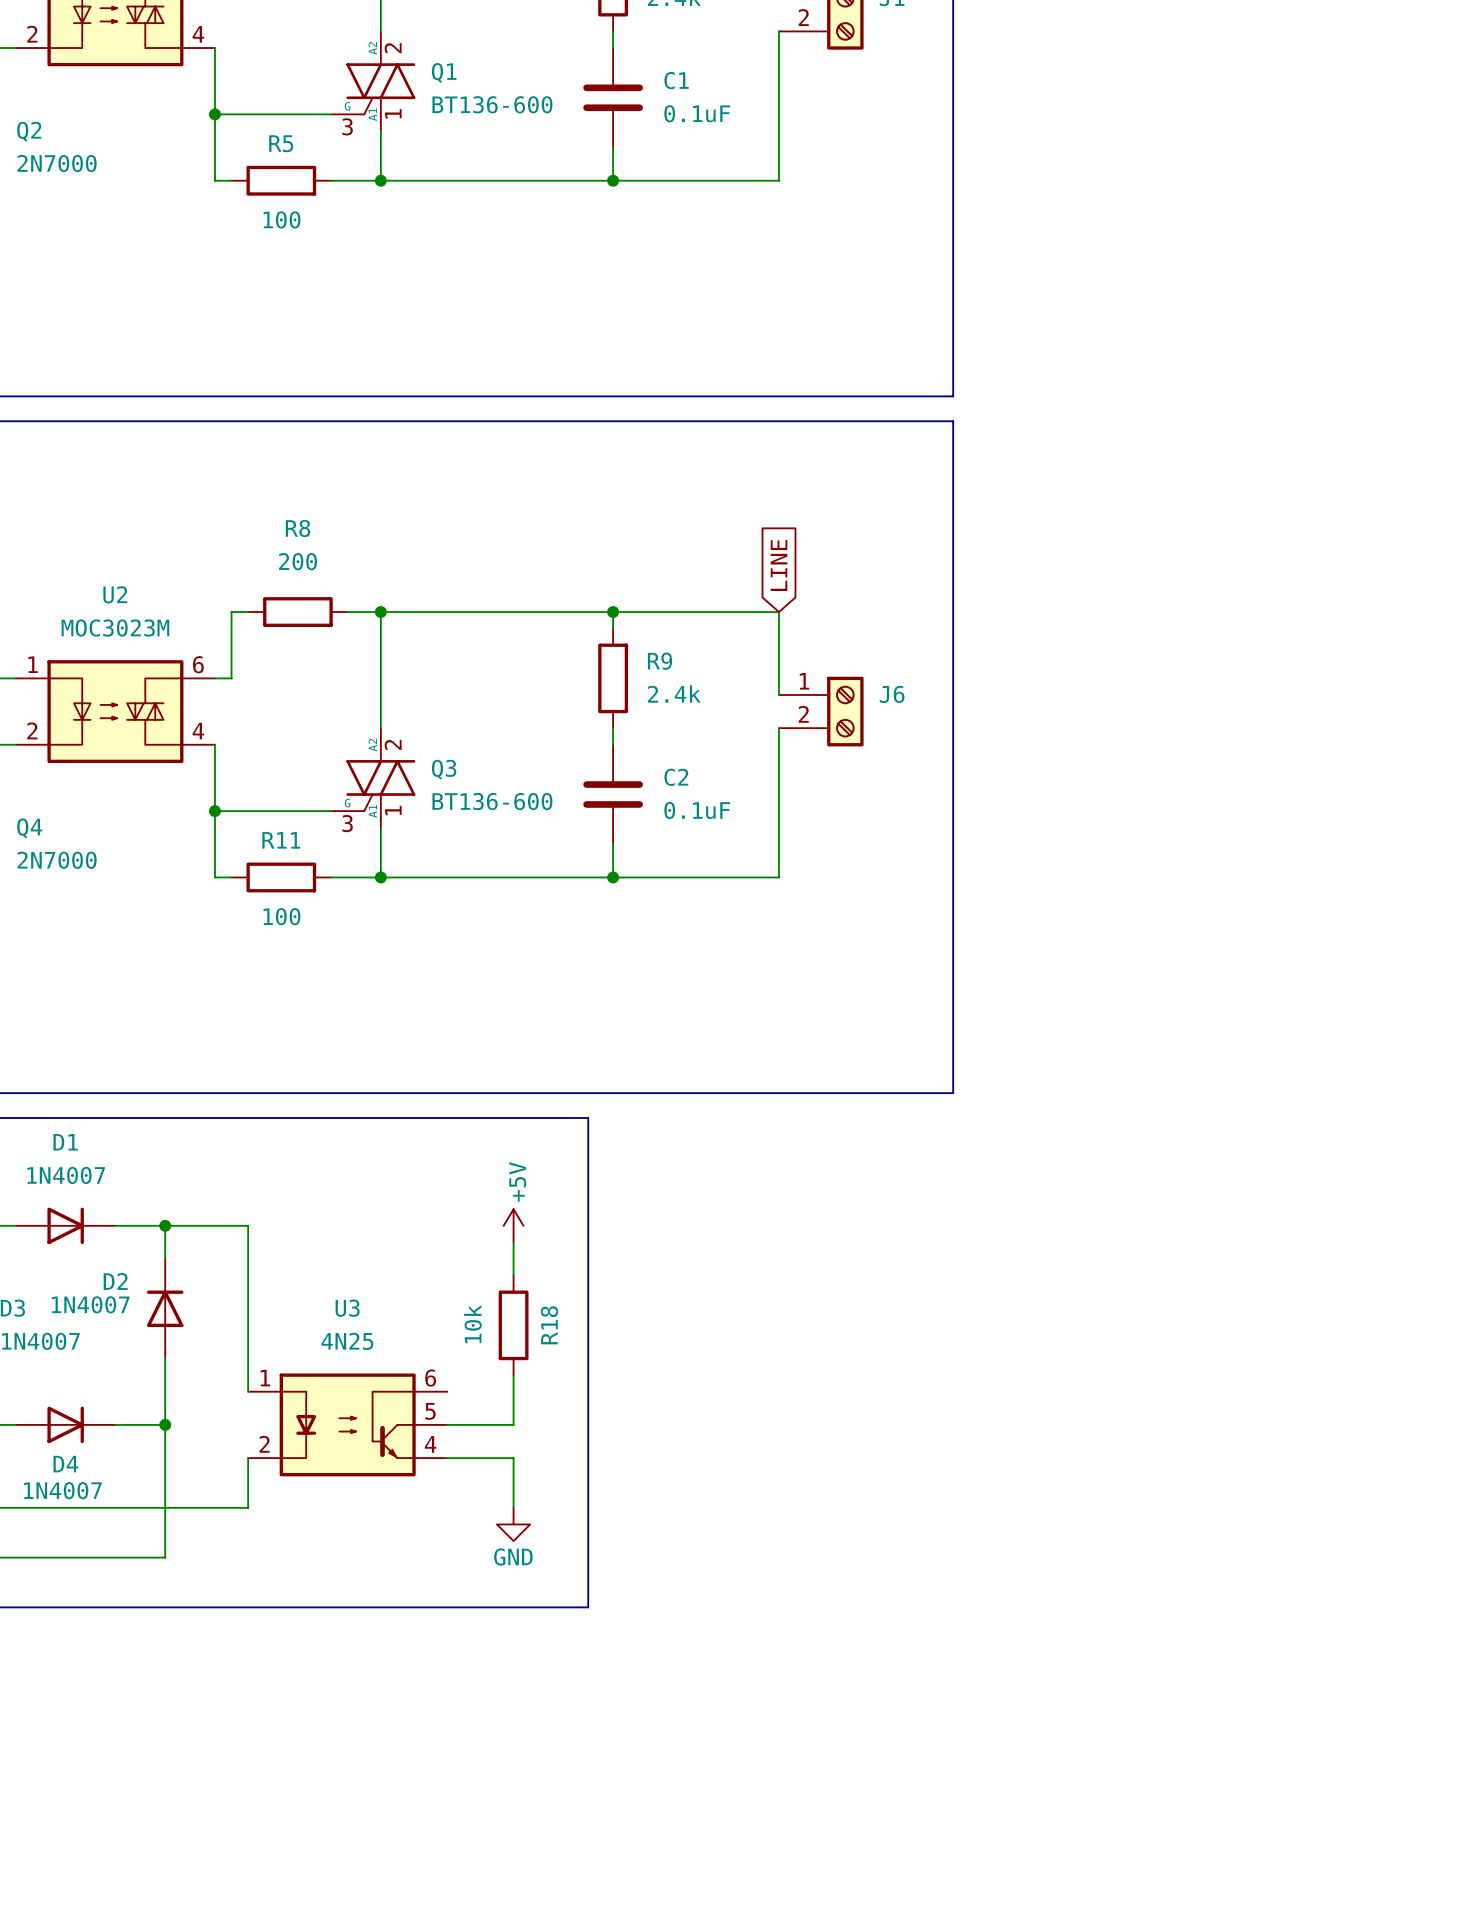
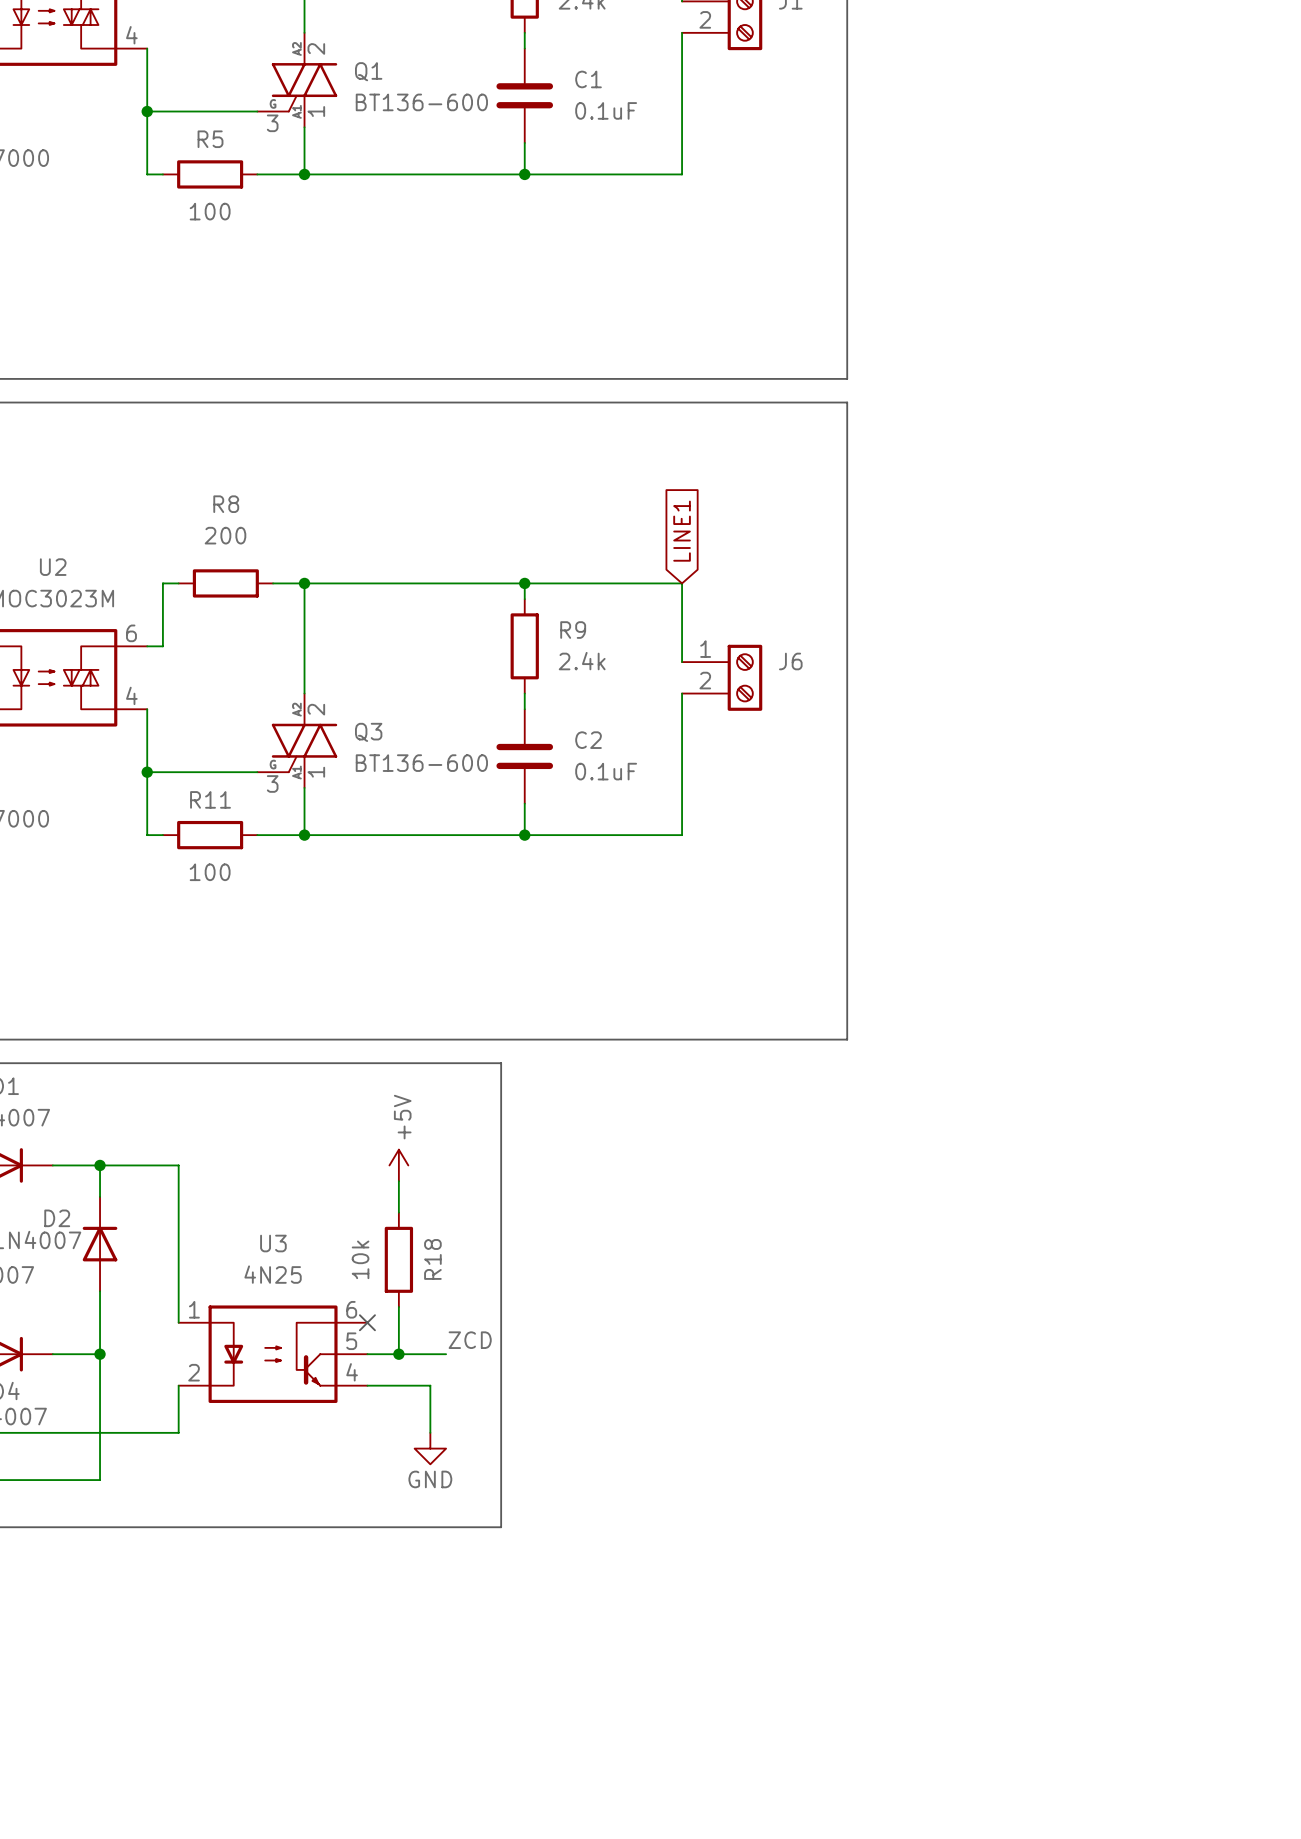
global label: LINE (779, 565) -> LINE1 (682, 531)
power symbol position: +5V (513, 1225) -> +5V (398, 1165)
wire: (513, 1242) (513, 1275) -> (398, 1181) (398, 1212)
R18 position: (513, 1325) -> (398, 1259)
wire: none -> (398, 1307) (398, 1354)
wire: (513, 1375) (513, 1424) -> (446, 1354) (430, 1354)
no-connect mark: none -> (367, 1322)
label: none -> ZCD (470, 1340)
junction: none -> (398, 1354)

